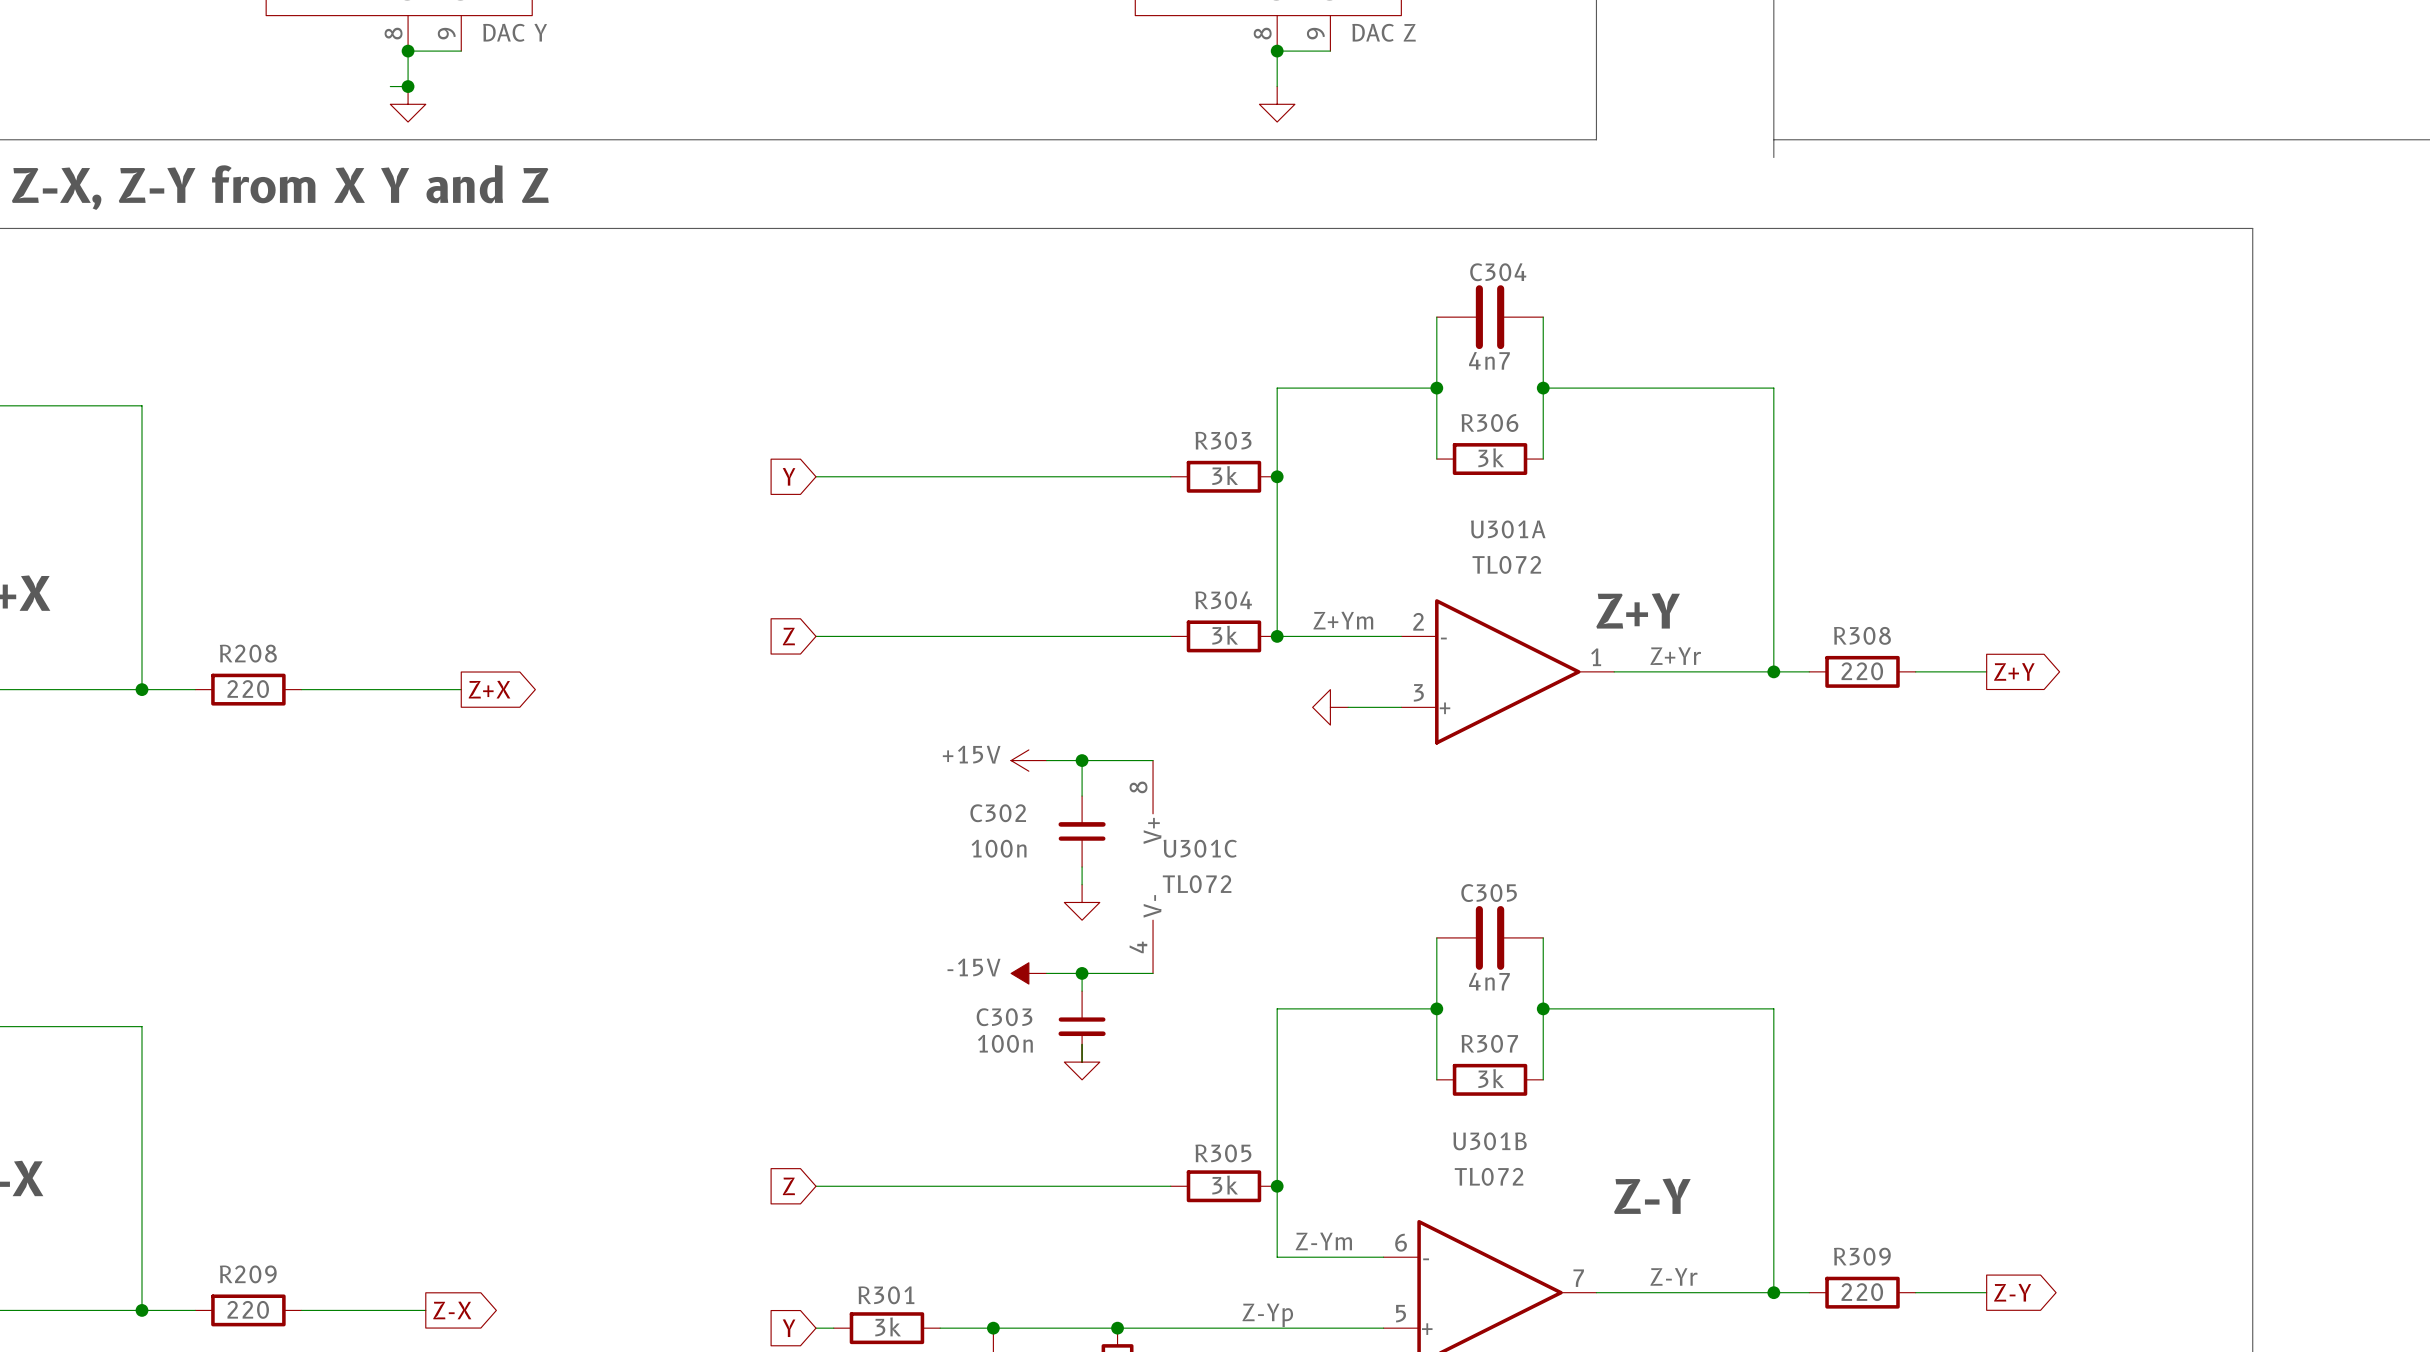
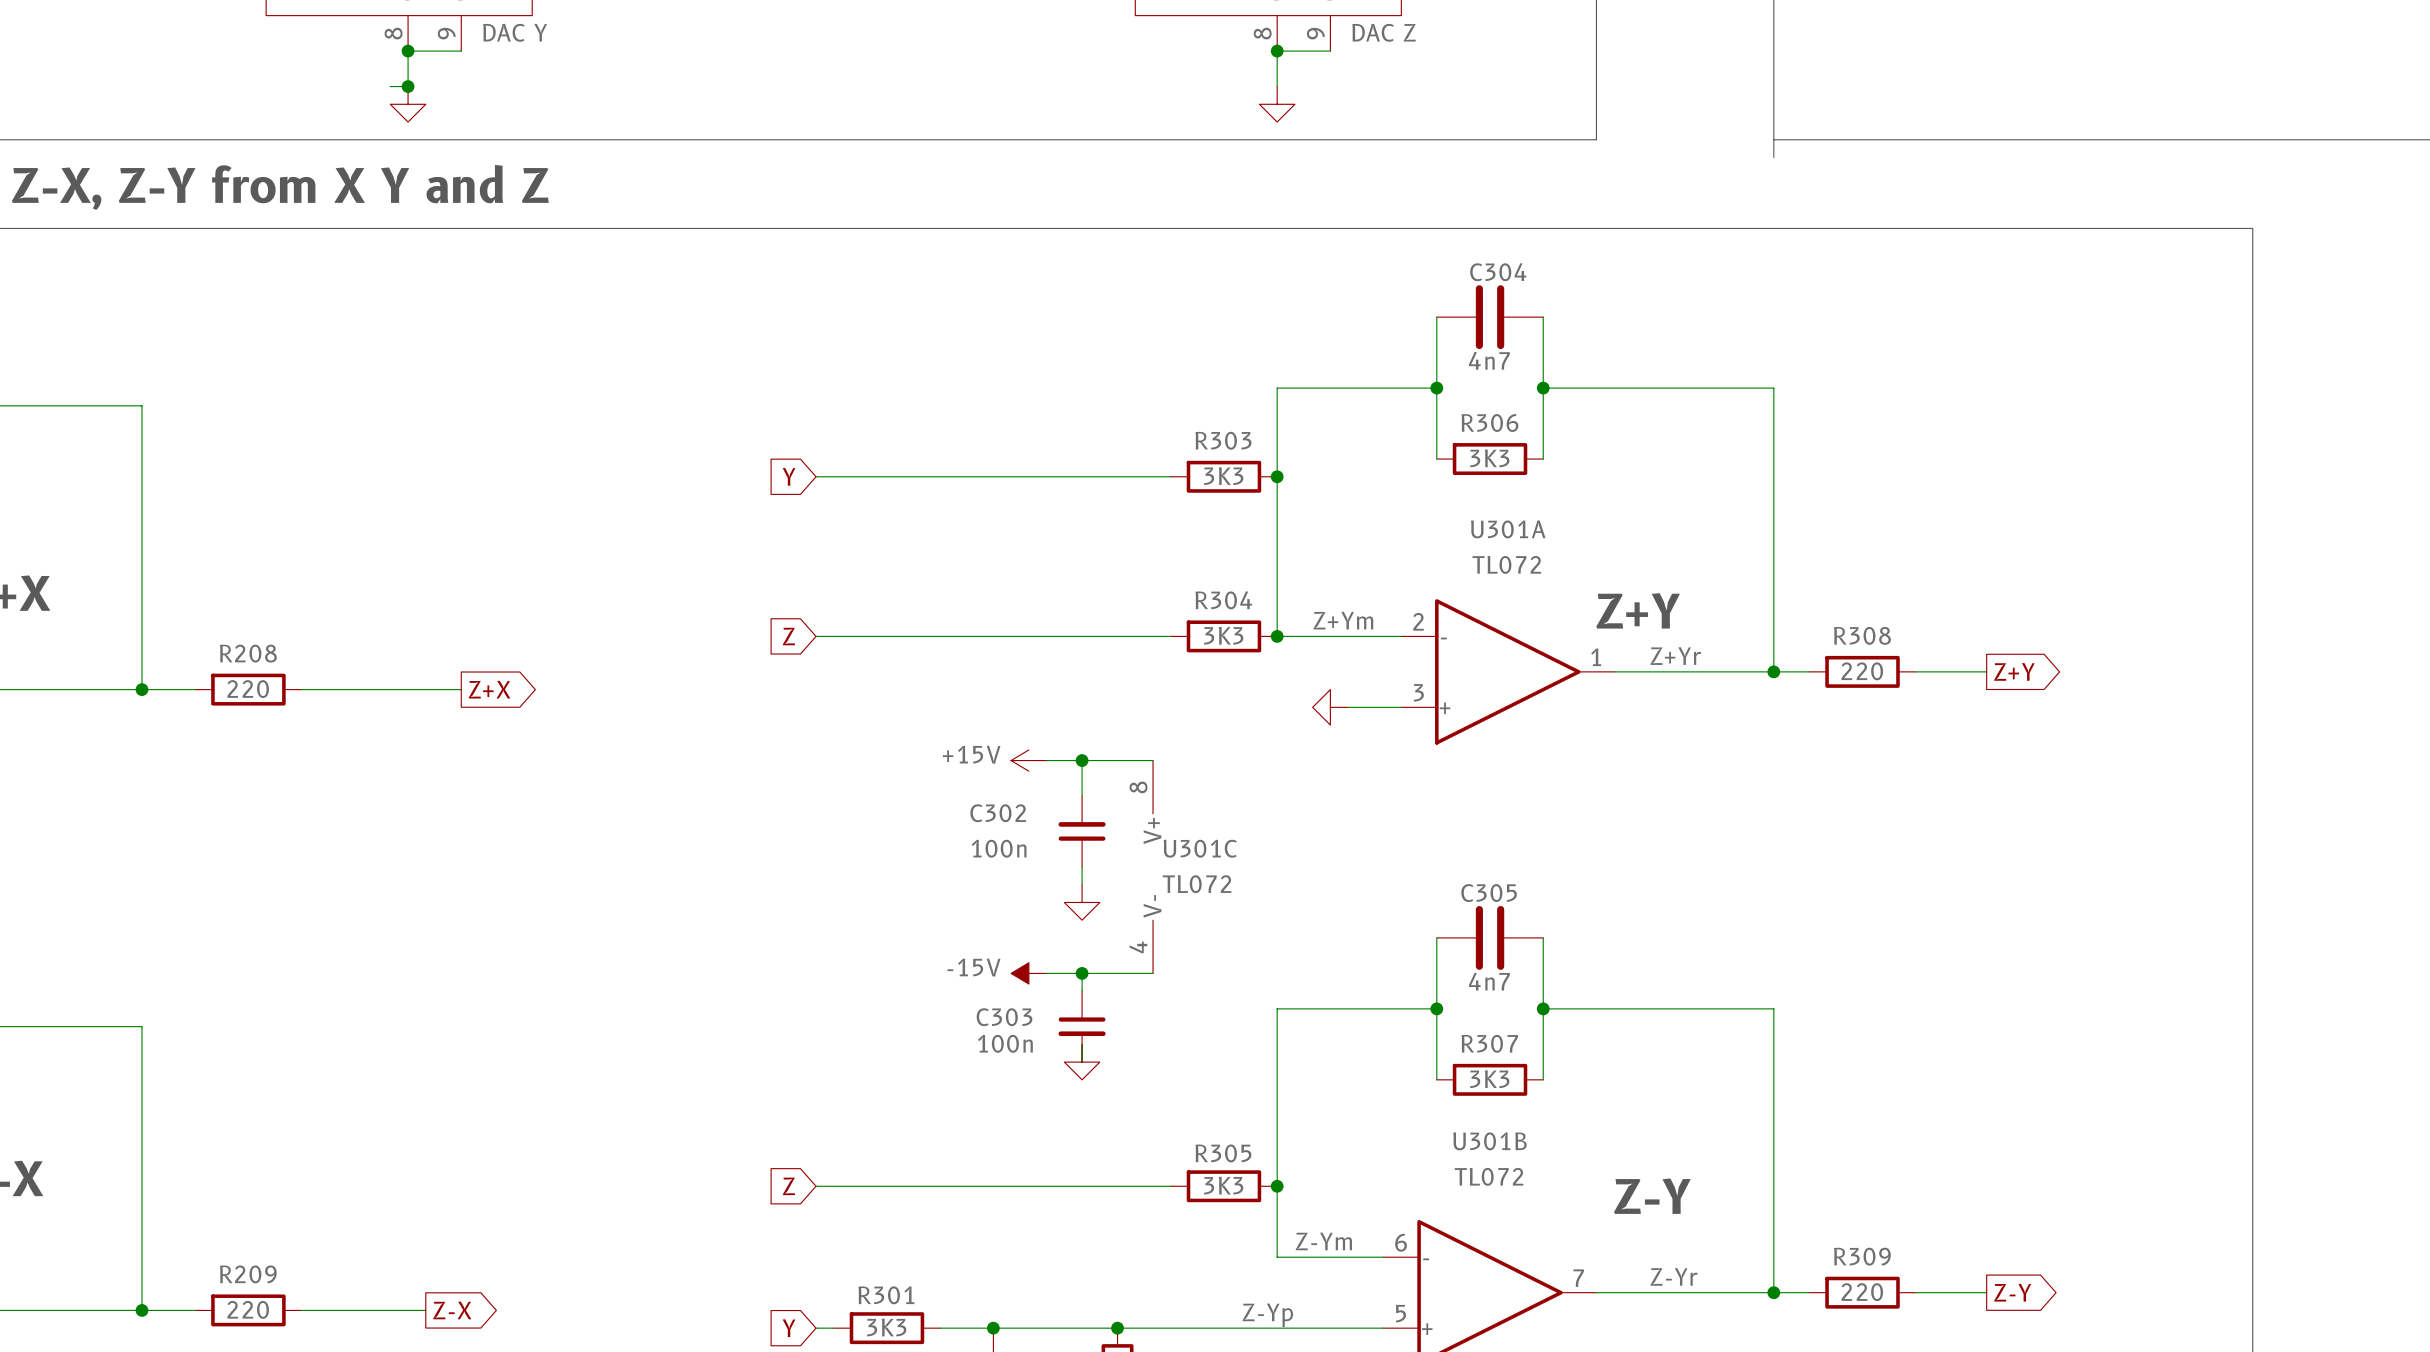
R306 value: 3k (1491, 457) -> 3K3 (1489, 458)
R303 value: 3k (1225, 475) -> 3K3 (1223, 476)
R304 value: 3k (1225, 635) -> 3K3 (1223, 635)
R307 value: 3k (1491, 1078) -> 3K3 (1489, 1079)
R305 value: 3k (1225, 1185) -> 3K3 (1223, 1185)
R301 value: 3k (888, 1326) -> 3K3 (886, 1327)

